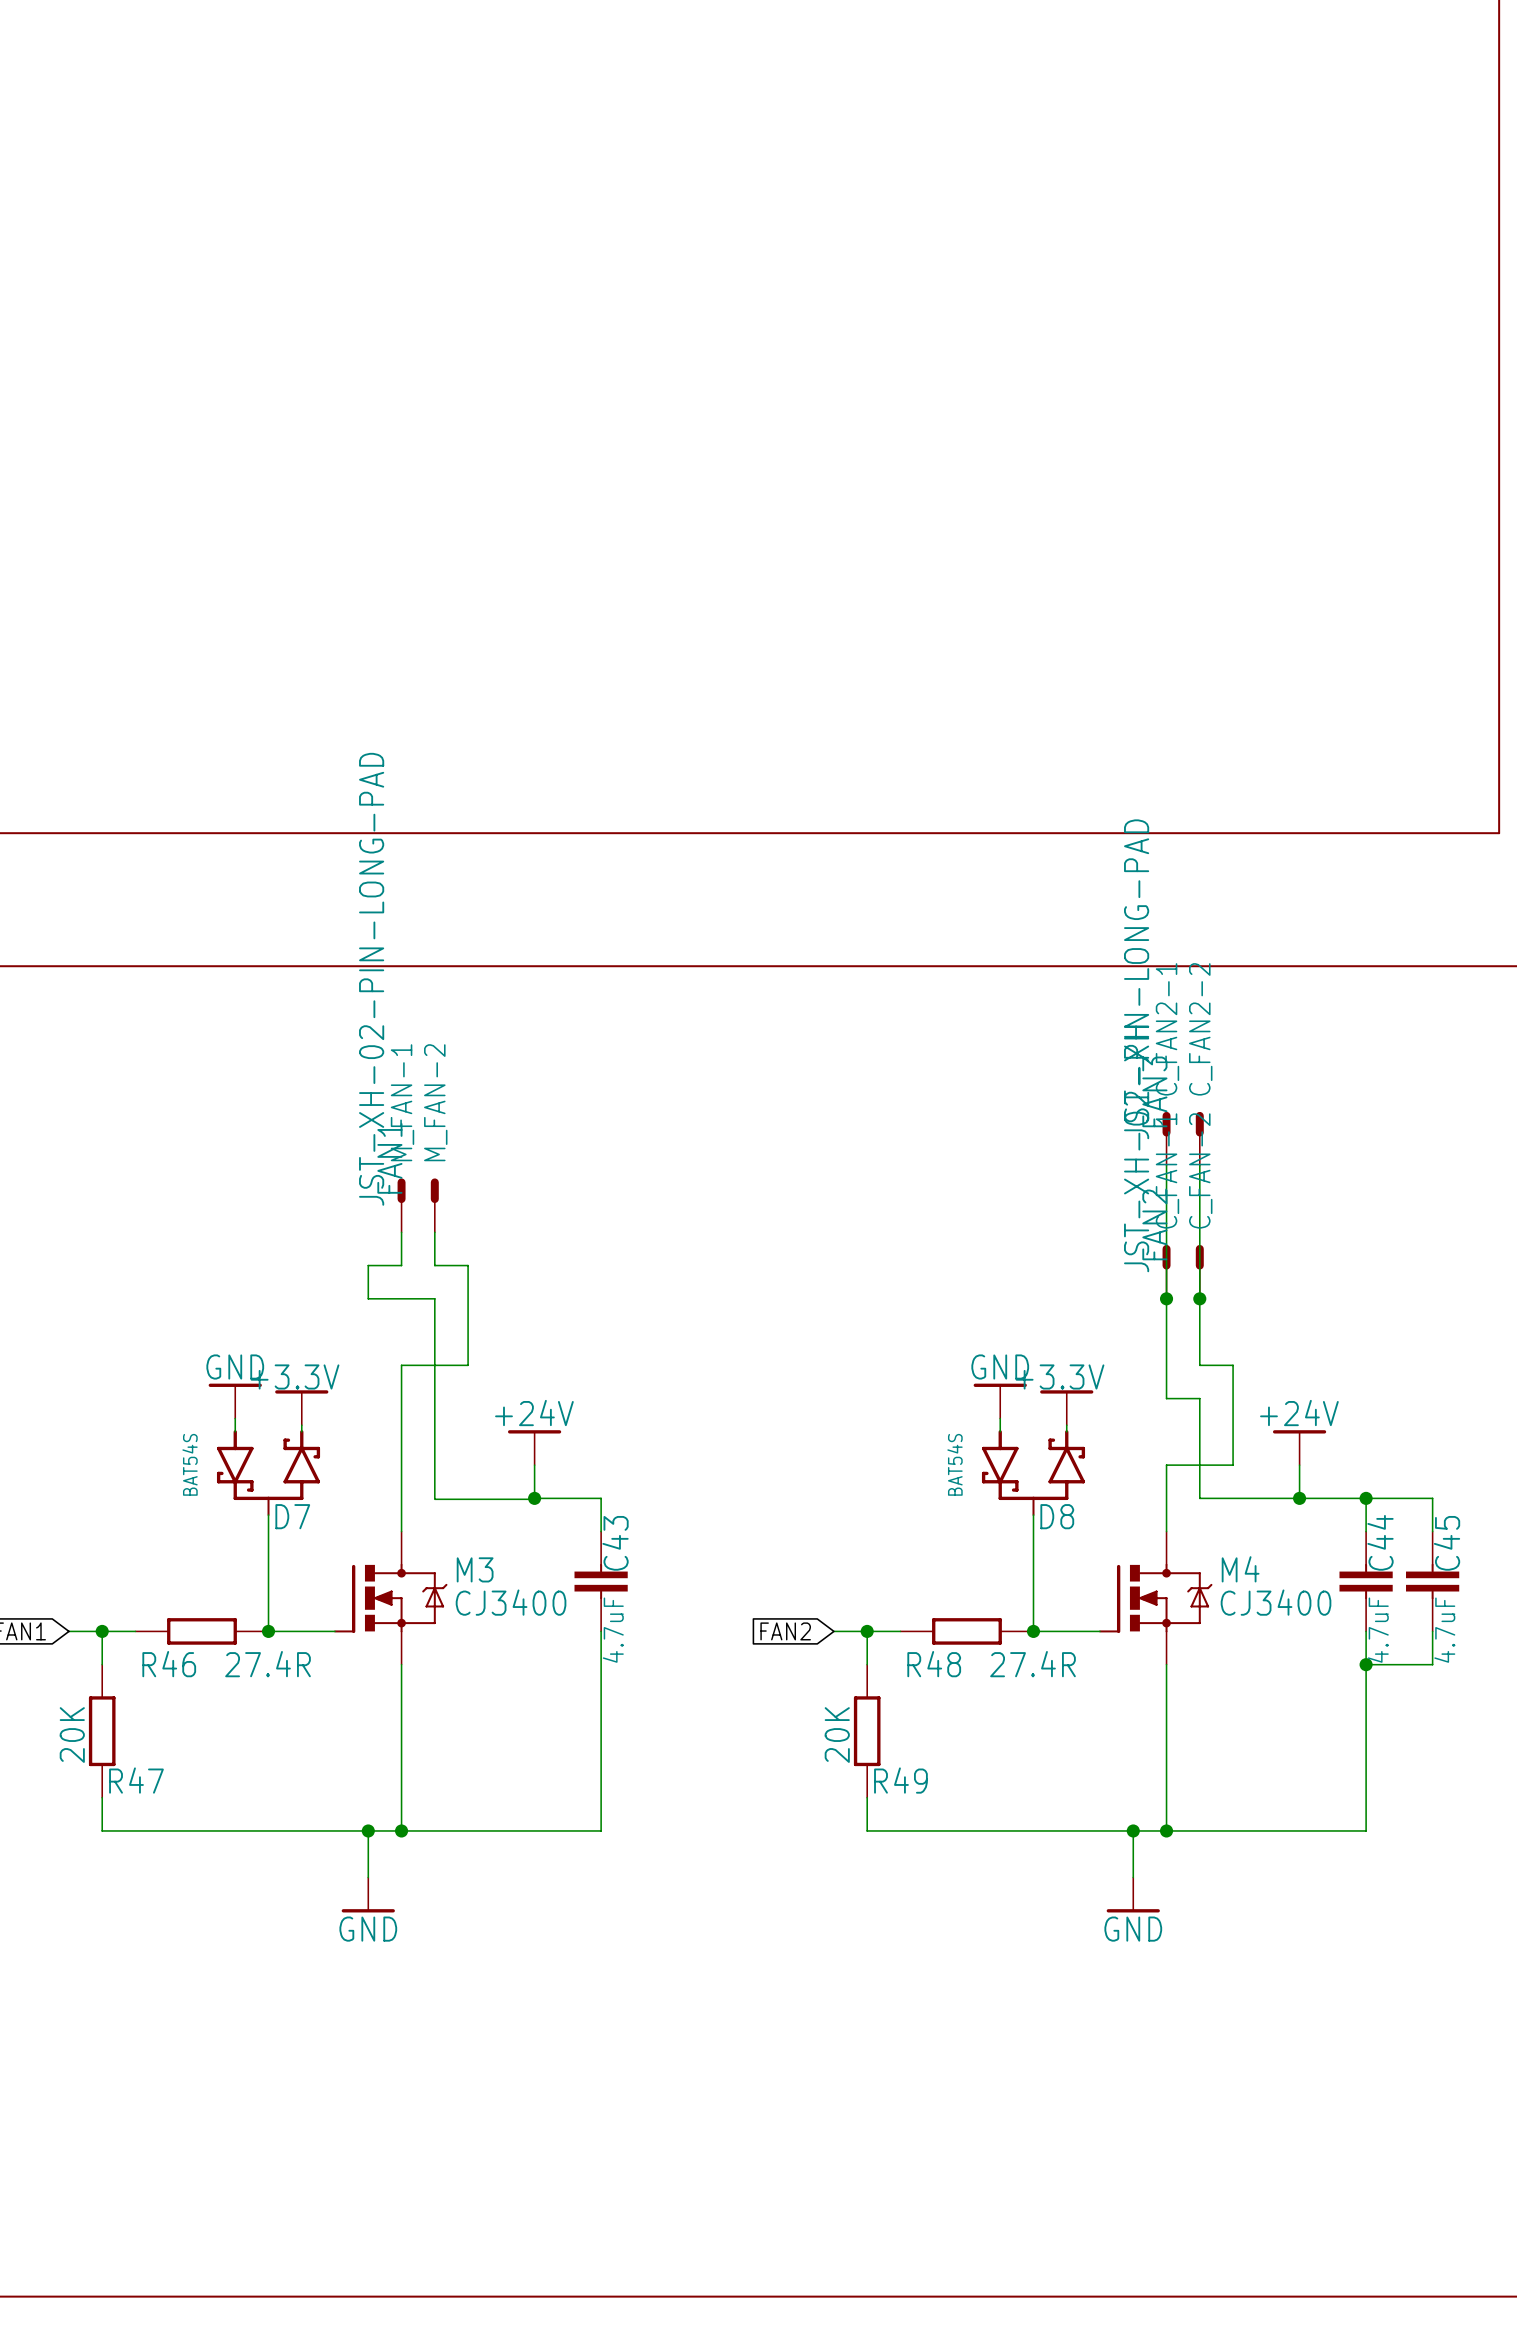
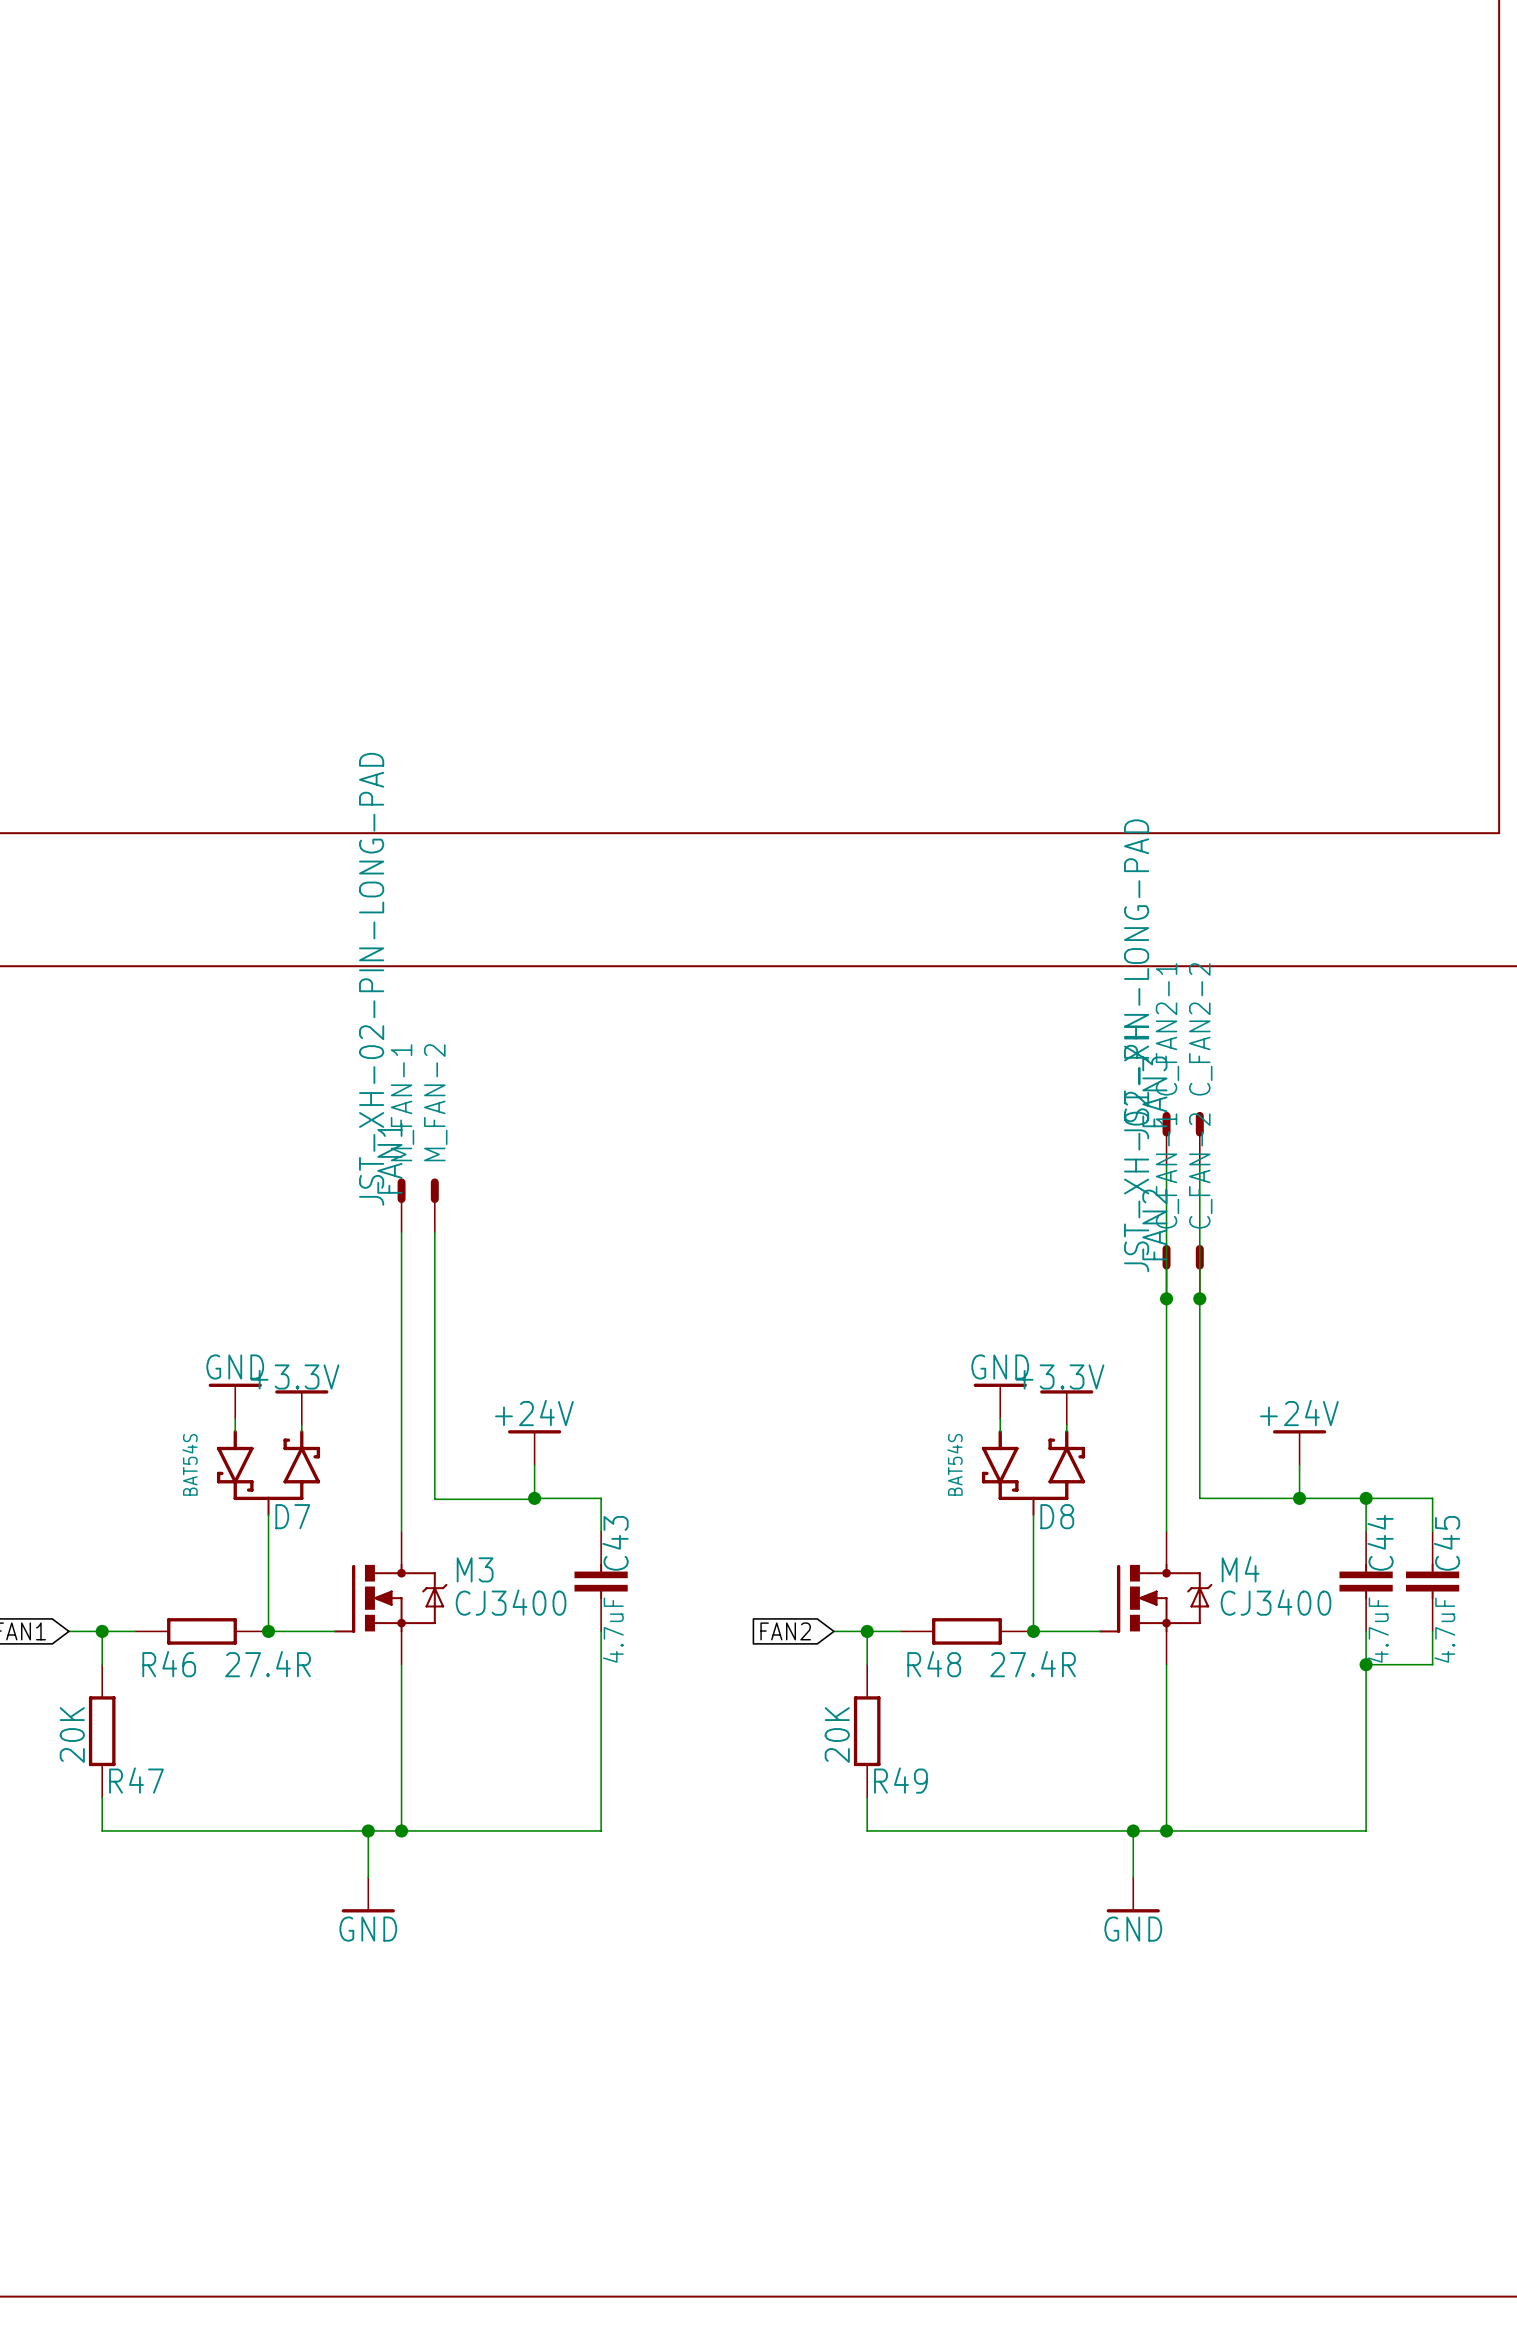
wire: (401, 1265) (368, 1265) (368, 1298) (434, 1298) -> (434, 1265) (434, 1298)
wire: (434, 1265) (468, 1265) (468, 1365) (401, 1365) -> (401, 1265) (401, 1365)
wire: (1199, 1365) (1233, 1365) (1233, 1465) (1166, 1465) -> (1166, 1398) (1166, 1465)
wire: (1166, 1398) (1199, 1398) -> (1199, 1365) (1199, 1398)

